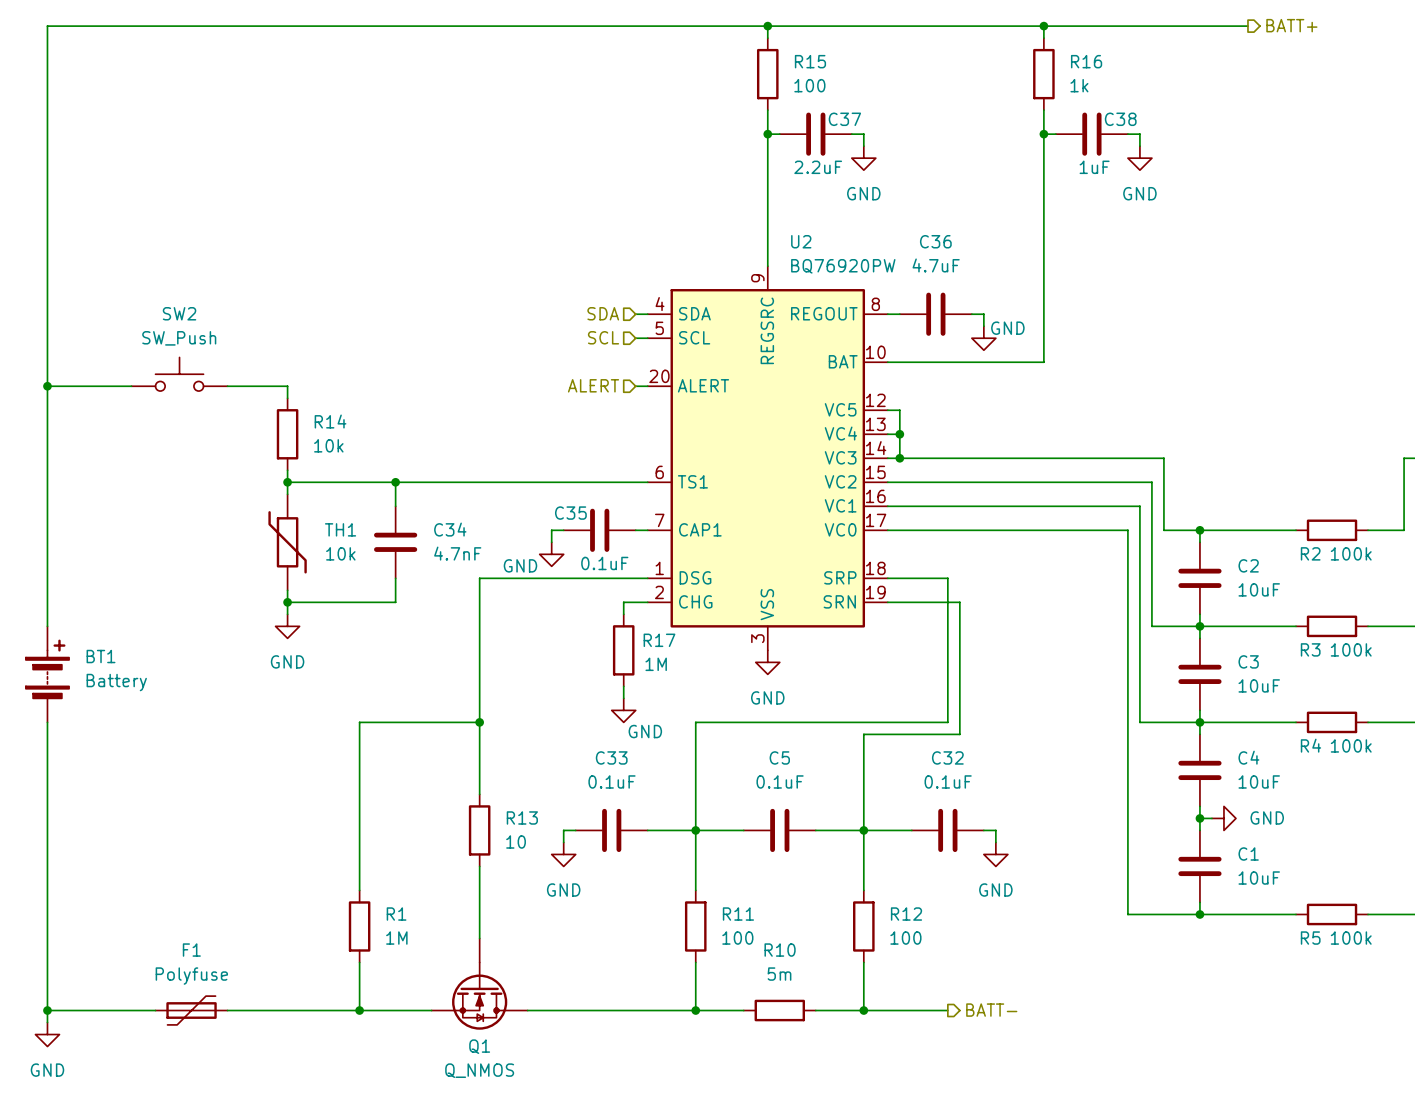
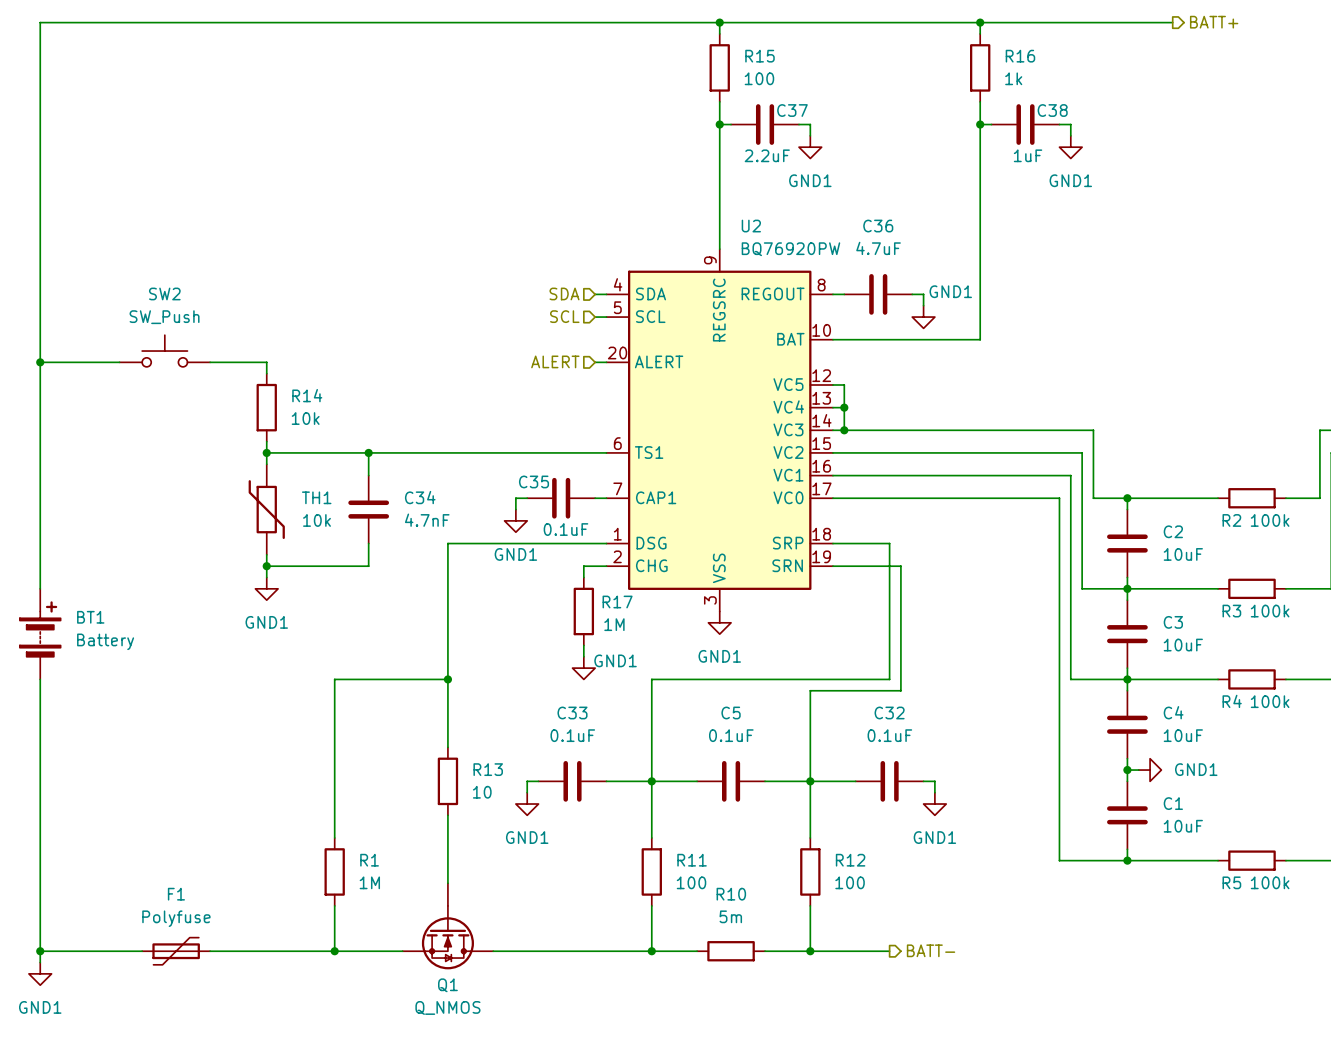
power symbol: GND (863, 158) -> GND1 (810, 147)
power symbol: GND (1139, 158) -> GND1 (1070, 147)
power symbol: GND (983, 338) -> GND1 (923, 317)
power symbol: GND (551, 554) -> GND1 (515, 520)
power symbol: GND (287, 626) -> GND1 (266, 588)
power symbol: GND (767, 662) -> GND1 (719, 622)
power symbol: GND (623, 710) -> GND1 (583, 668)
power symbol: GND (1223, 818) -> GND1 (1150, 770)
power symbol: GND (563, 854) -> GND1 (527, 804)
power symbol: GND (995, 854) -> GND1 (934, 804)
power symbol: GND (47, 1034) -> GND1 (40, 973)

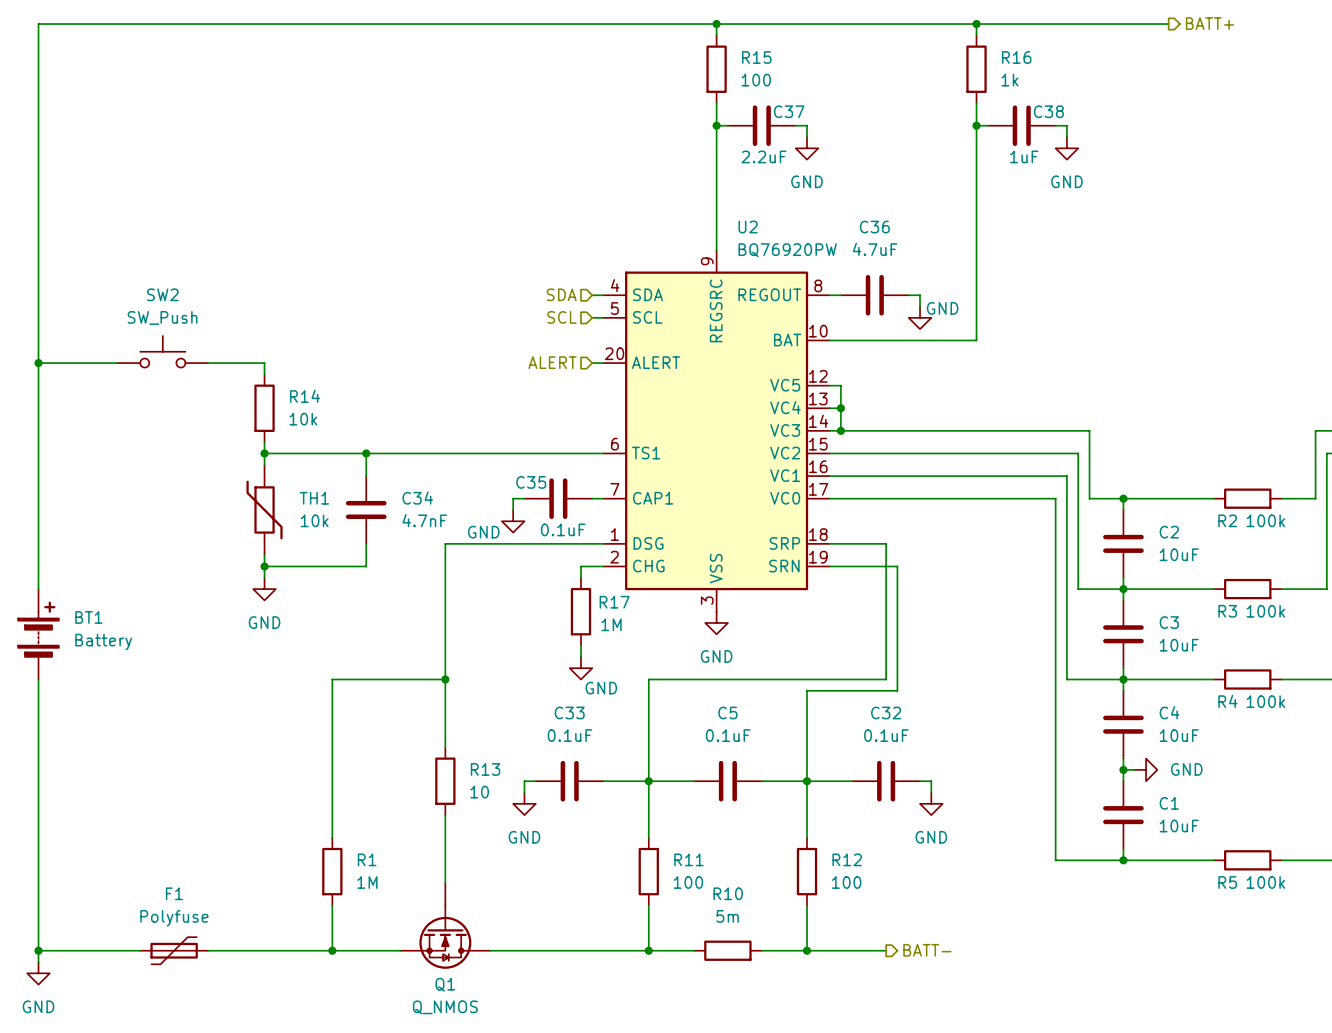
power symbol: GND1 (810, 147) -> GND (807, 148)
power symbol: GND1 (1070, 147) -> GND (1066, 148)
power symbol: GND1 (923, 317) -> GND (920, 317)
power symbol: GND1 (515, 520) -> GND (513, 521)
power symbol: GND1 (266, 588) -> GND (264, 589)
power symbol: GND1 (719, 622) -> GND (716, 622)
power symbol: GND1 (583, 668) -> GND (580, 668)
power symbol: GND1 (1150, 770) -> GND (1146, 769)
power symbol: GND1 (527, 804) -> GND (524, 803)
power symbol: GND1 (934, 804) -> GND (931, 803)
power symbol: GND1 (40, 973) -> GND (38, 973)

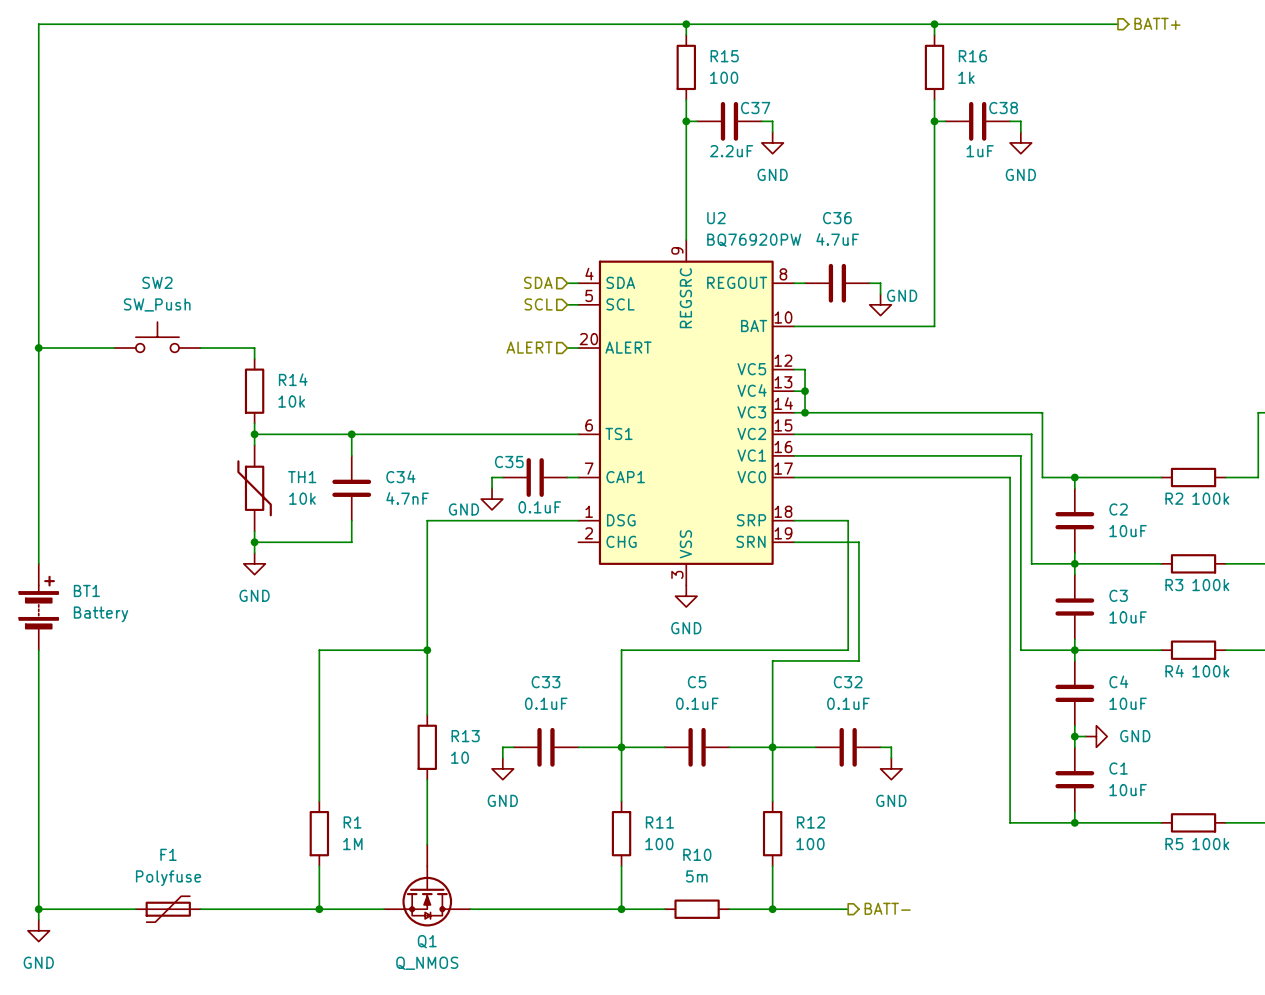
wire: (603, 566) (580, 566) (580, 577) -> none
R17: 1M (580, 611) -> none
wire: (580, 645) (580, 656) -> none
power symbol: GND (580, 668) -> none

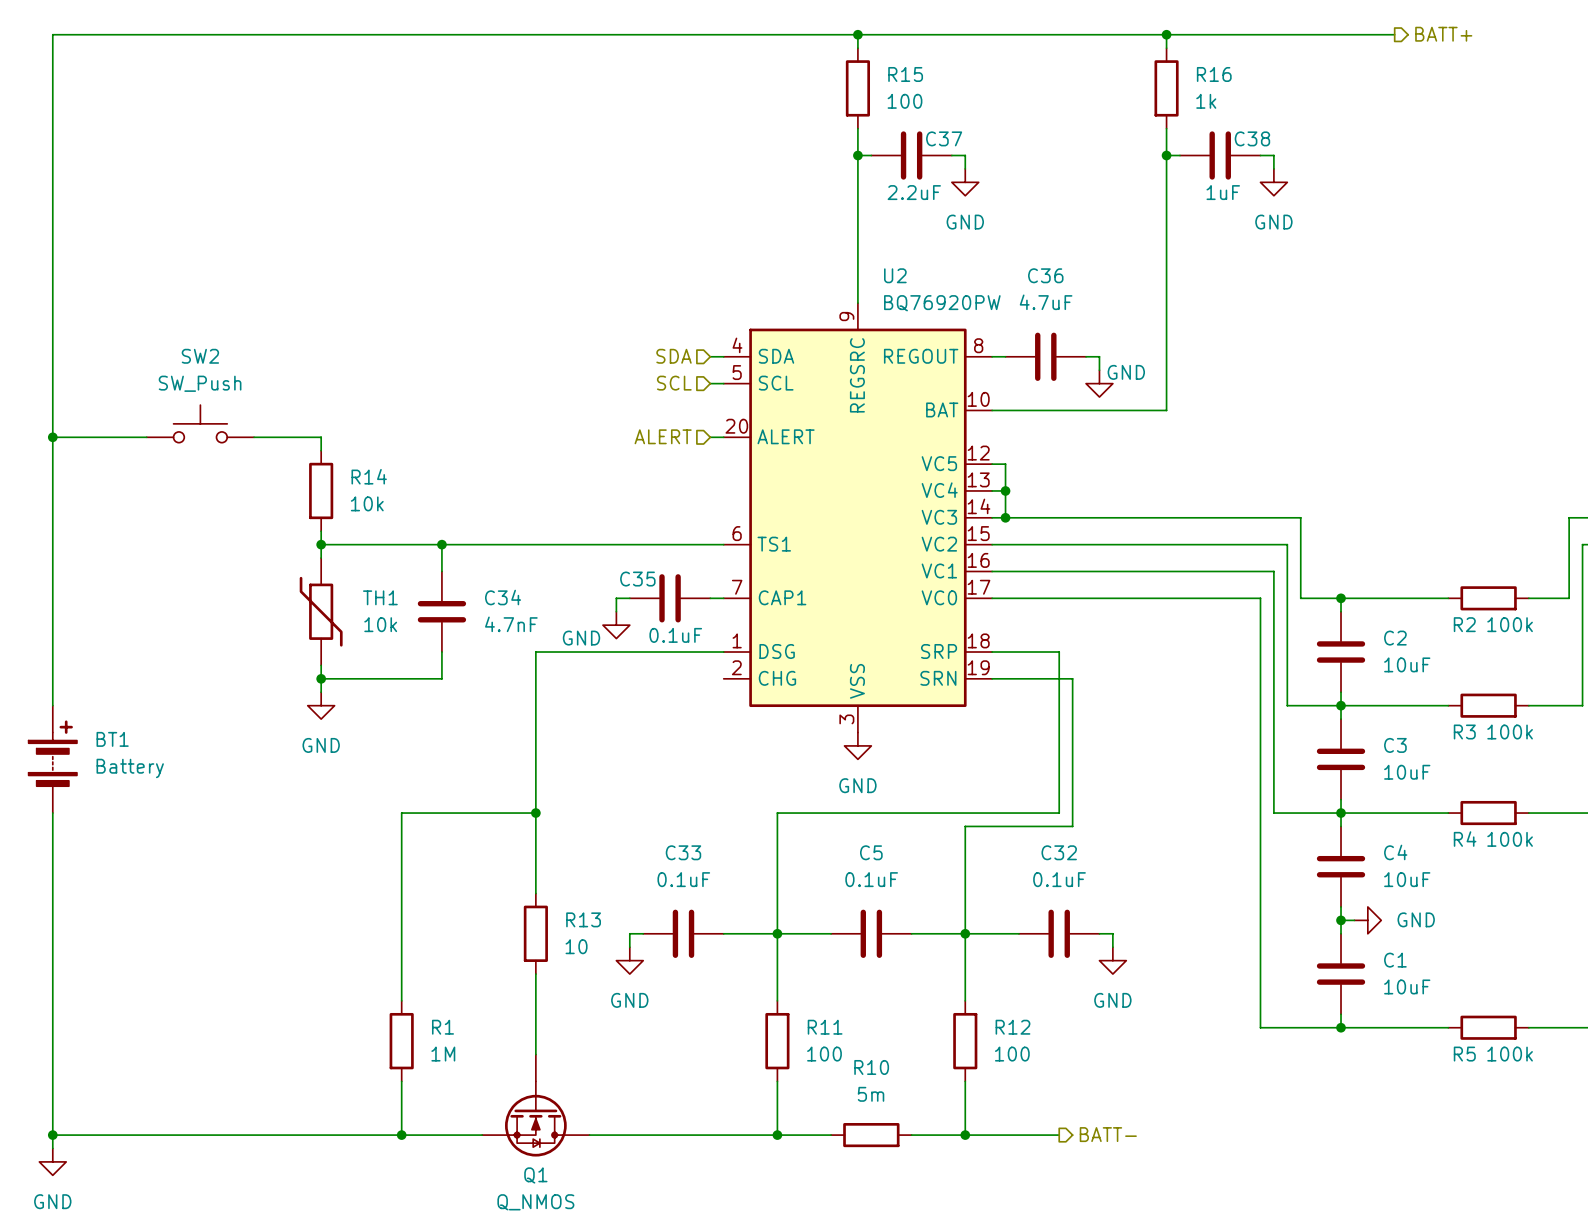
F1: Polyfuse (168, 909) -> none

